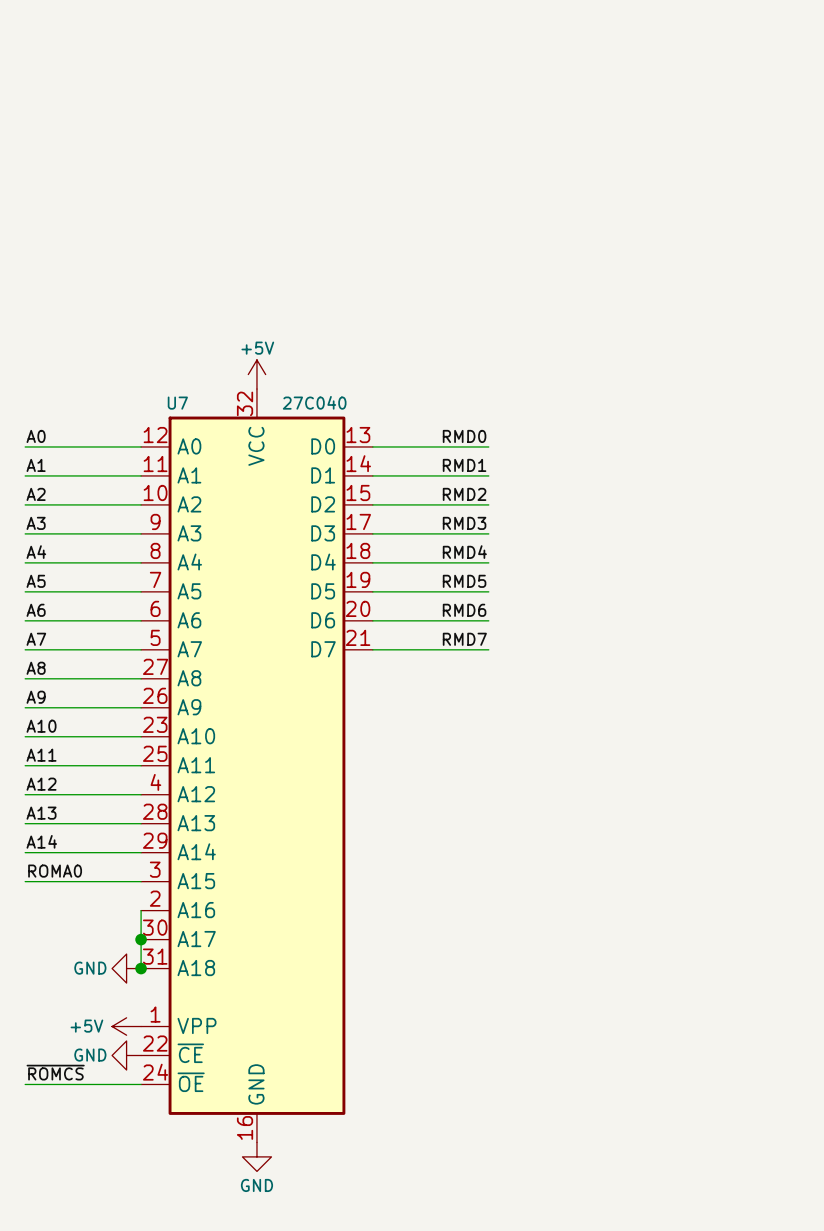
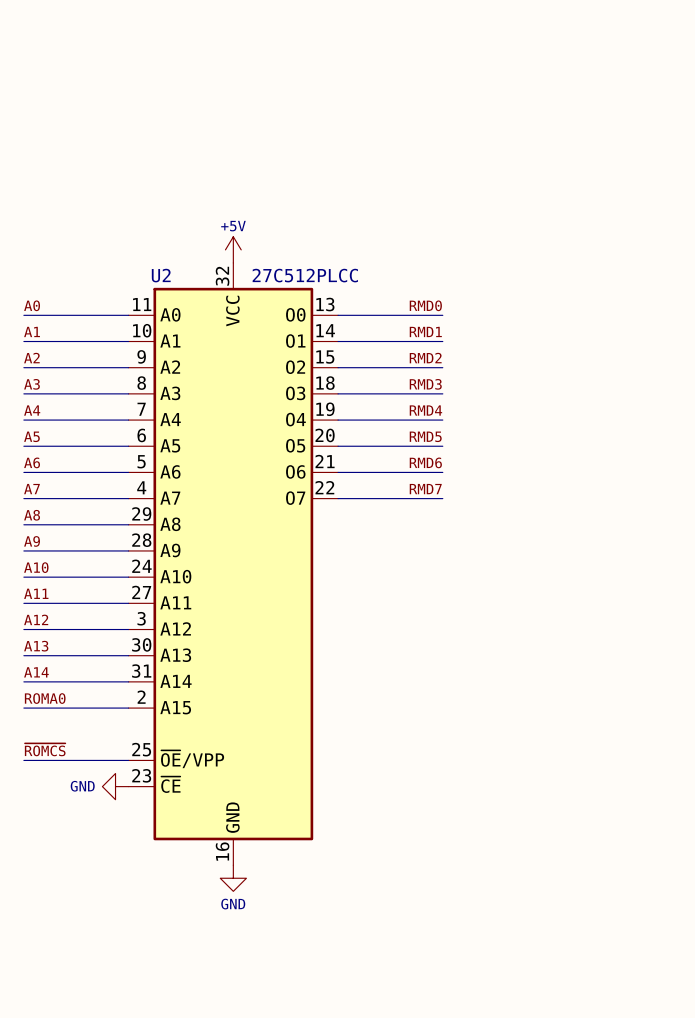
U2: none -> 27C512PLCC (233, 564)
U7: 27C040 (256, 765) -> none
wire: (141, 910) (141, 968) -> none
junction: (141, 939) -> none
junction: (141, 968) -> none
power symbol: +5V (126, 1026) -> none
power symbol: GND (126, 1055) -> none
power symbol: none -> GND (233, 878)
label position: ~{ROMCS} (55, 1072) -> ~{ROMCS} (45, 749)
wire: (25, 1084) (141, 1084) -> (23, 760) (128, 760)
power symbol: GND (256, 1156) -> none

